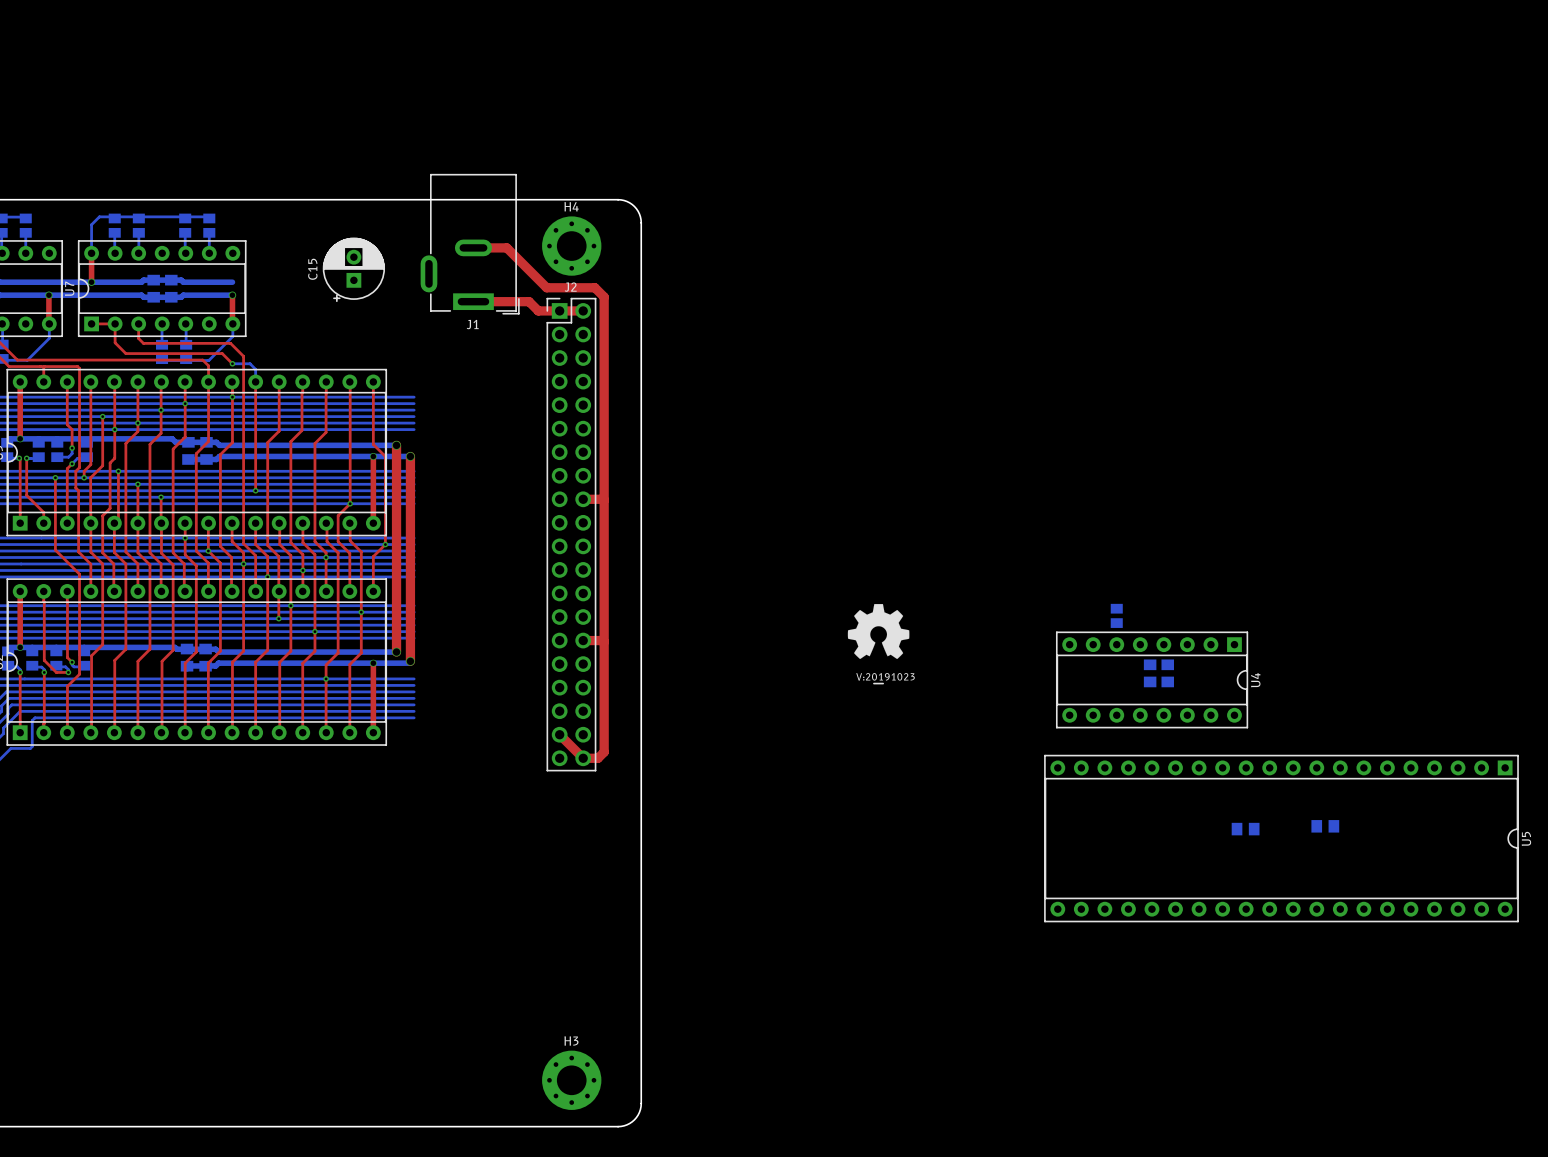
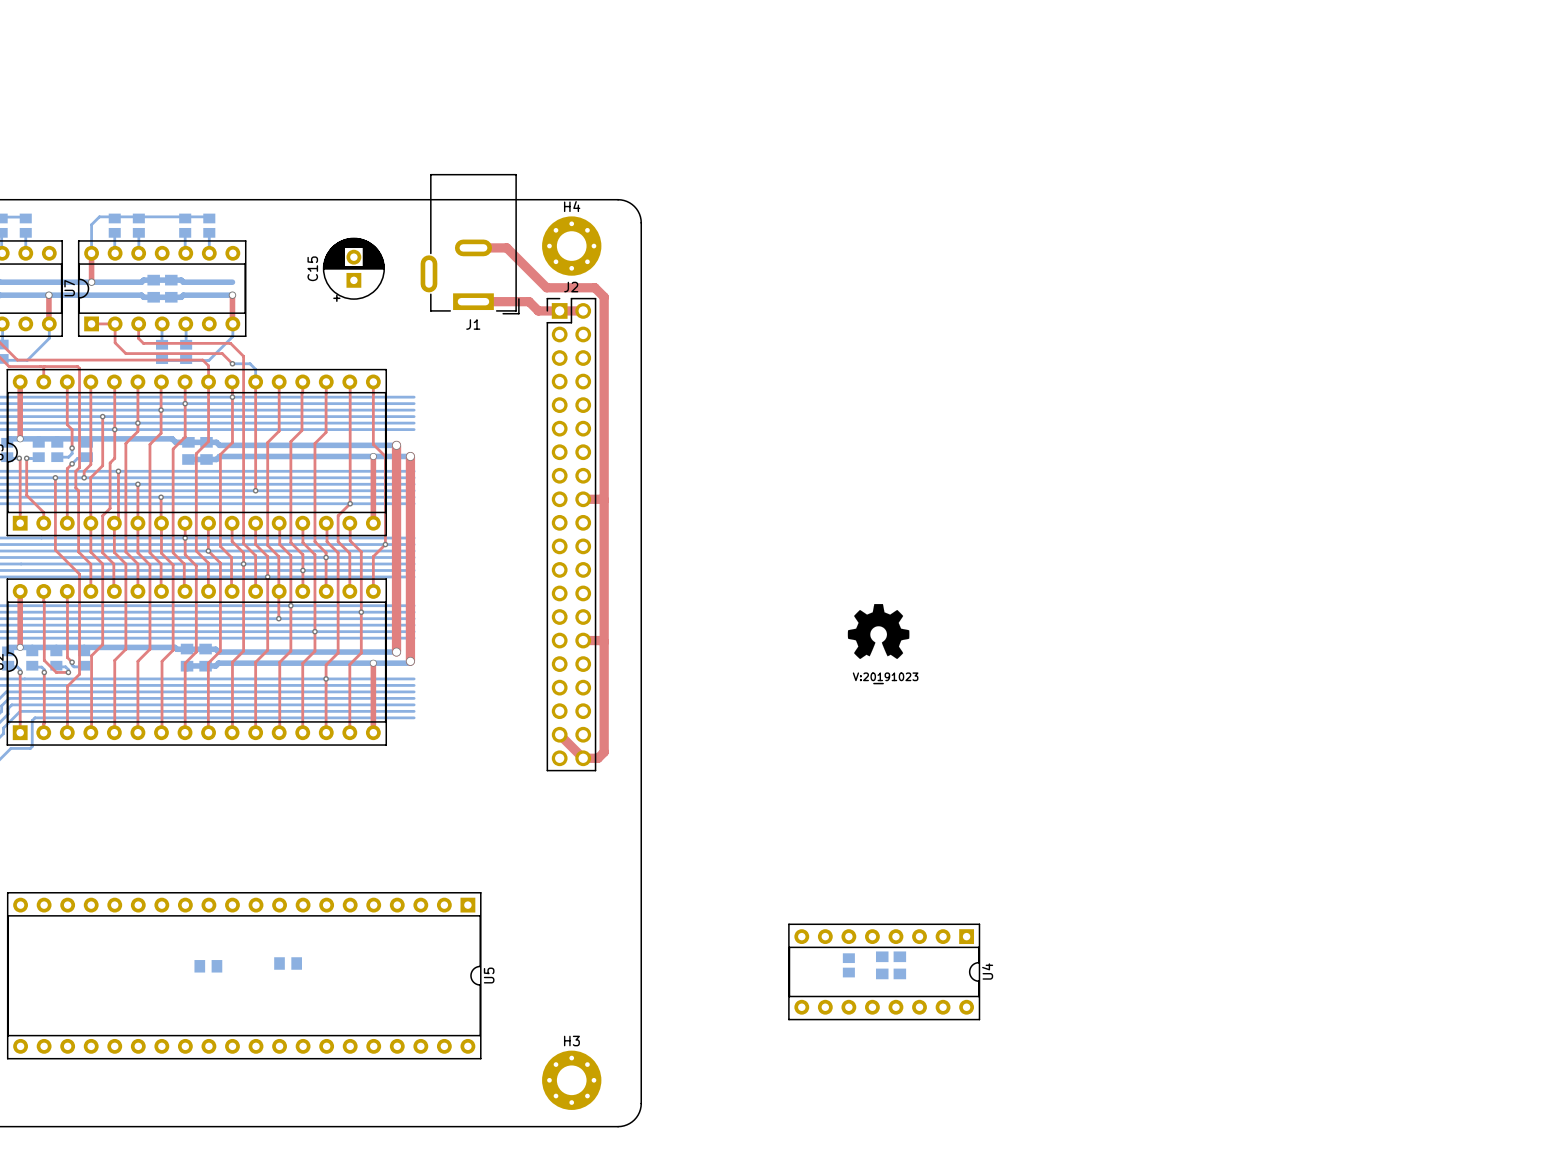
part: (1116, 615) -> none
part: (1150, 673) -> none
part: (1167, 673) -> none
U4 position: (1152, 679) -> (884, 971)
part: (1325, 826) -> none
part: (1245, 829) -> none
U5 position: (1281, 838) -> (244, 975)
part: none -> (288, 963)
part: none -> (848, 965)
part: none -> (882, 965)
part: none -> (899, 965)
part: none -> (208, 966)

